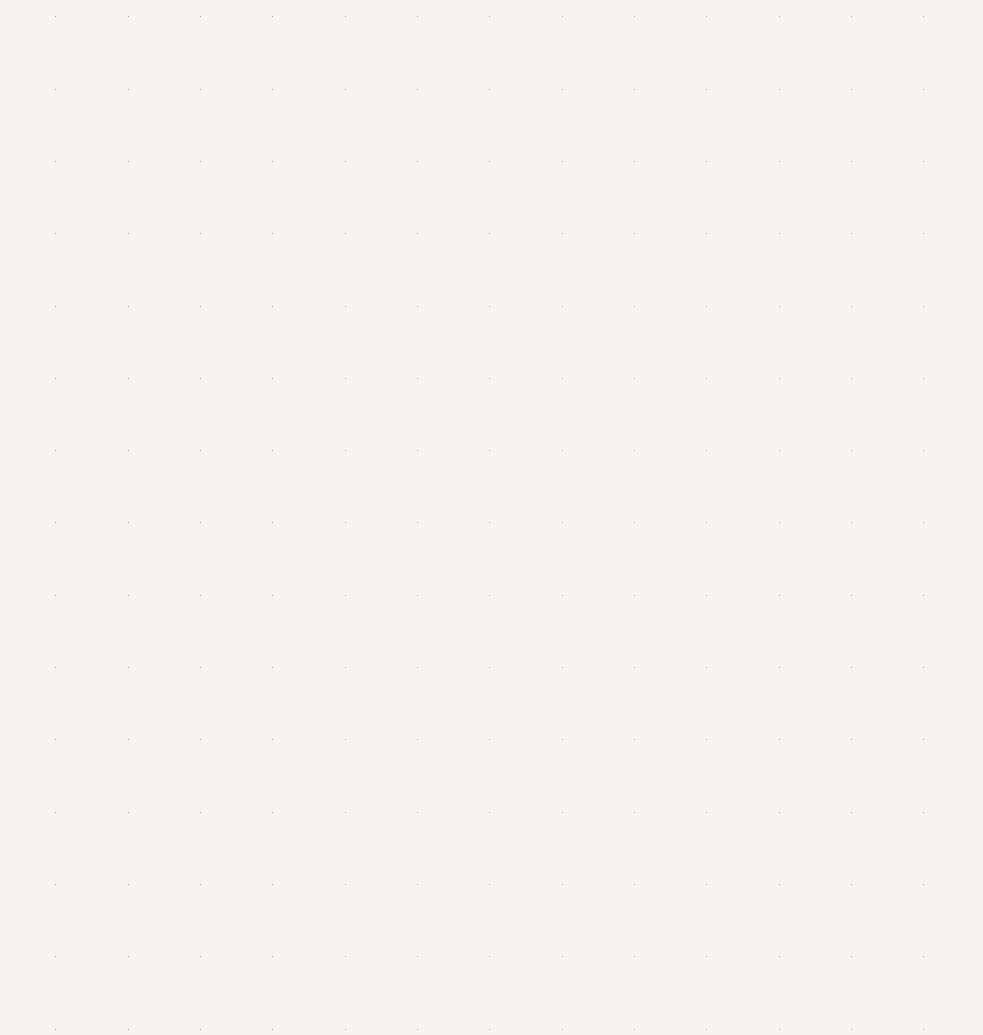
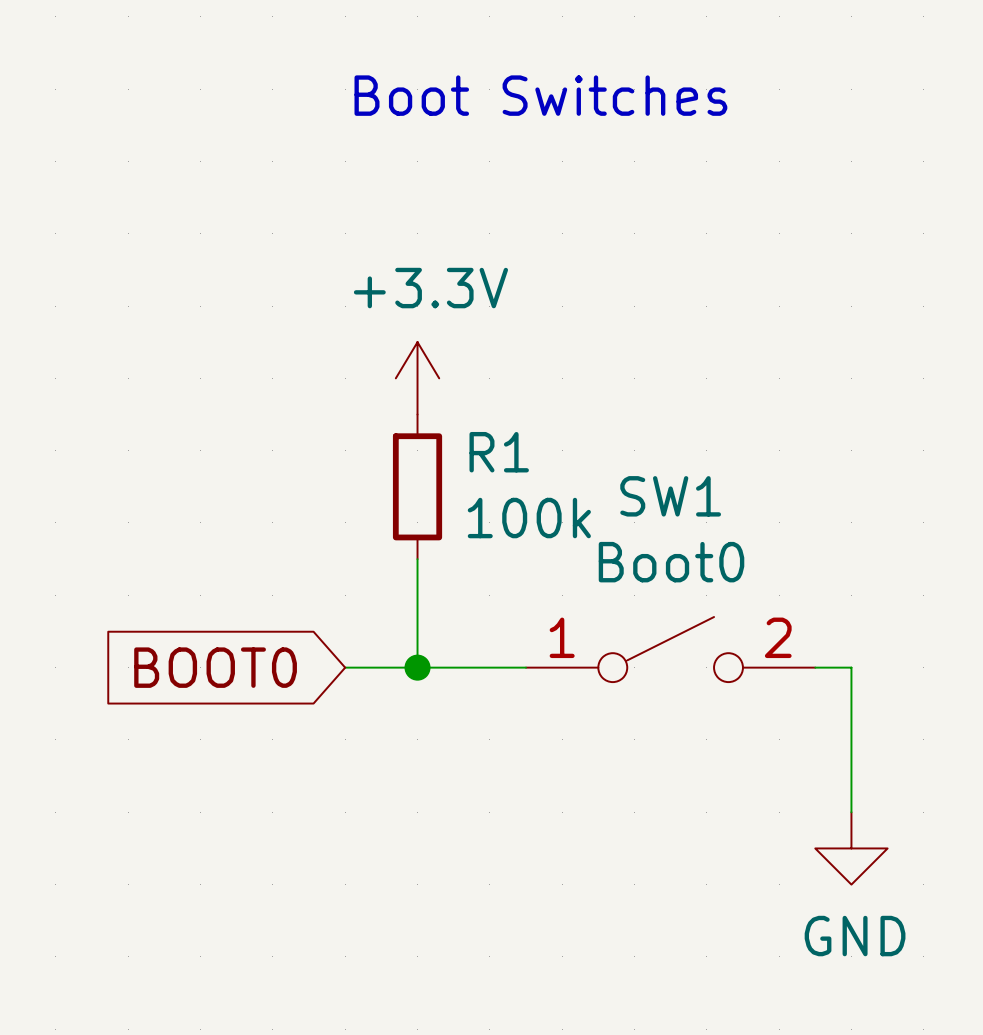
text: none -> Boot Switches (540, 95)
power symbol: none -> +3.3V (417, 378)
R1: none -> 100k (417, 486)
wire: none -> (417, 559) (417, 667)
SW1: none -> Boot0 (670, 649)
global label: none -> BOOT0 (215, 667)
wire: none -> (345, 667) (526, 667)
junction: none -> (417, 667)
wire: none -> (815, 667) (851, 667) (851, 812)
power symbol: none -> GND (851, 848)

